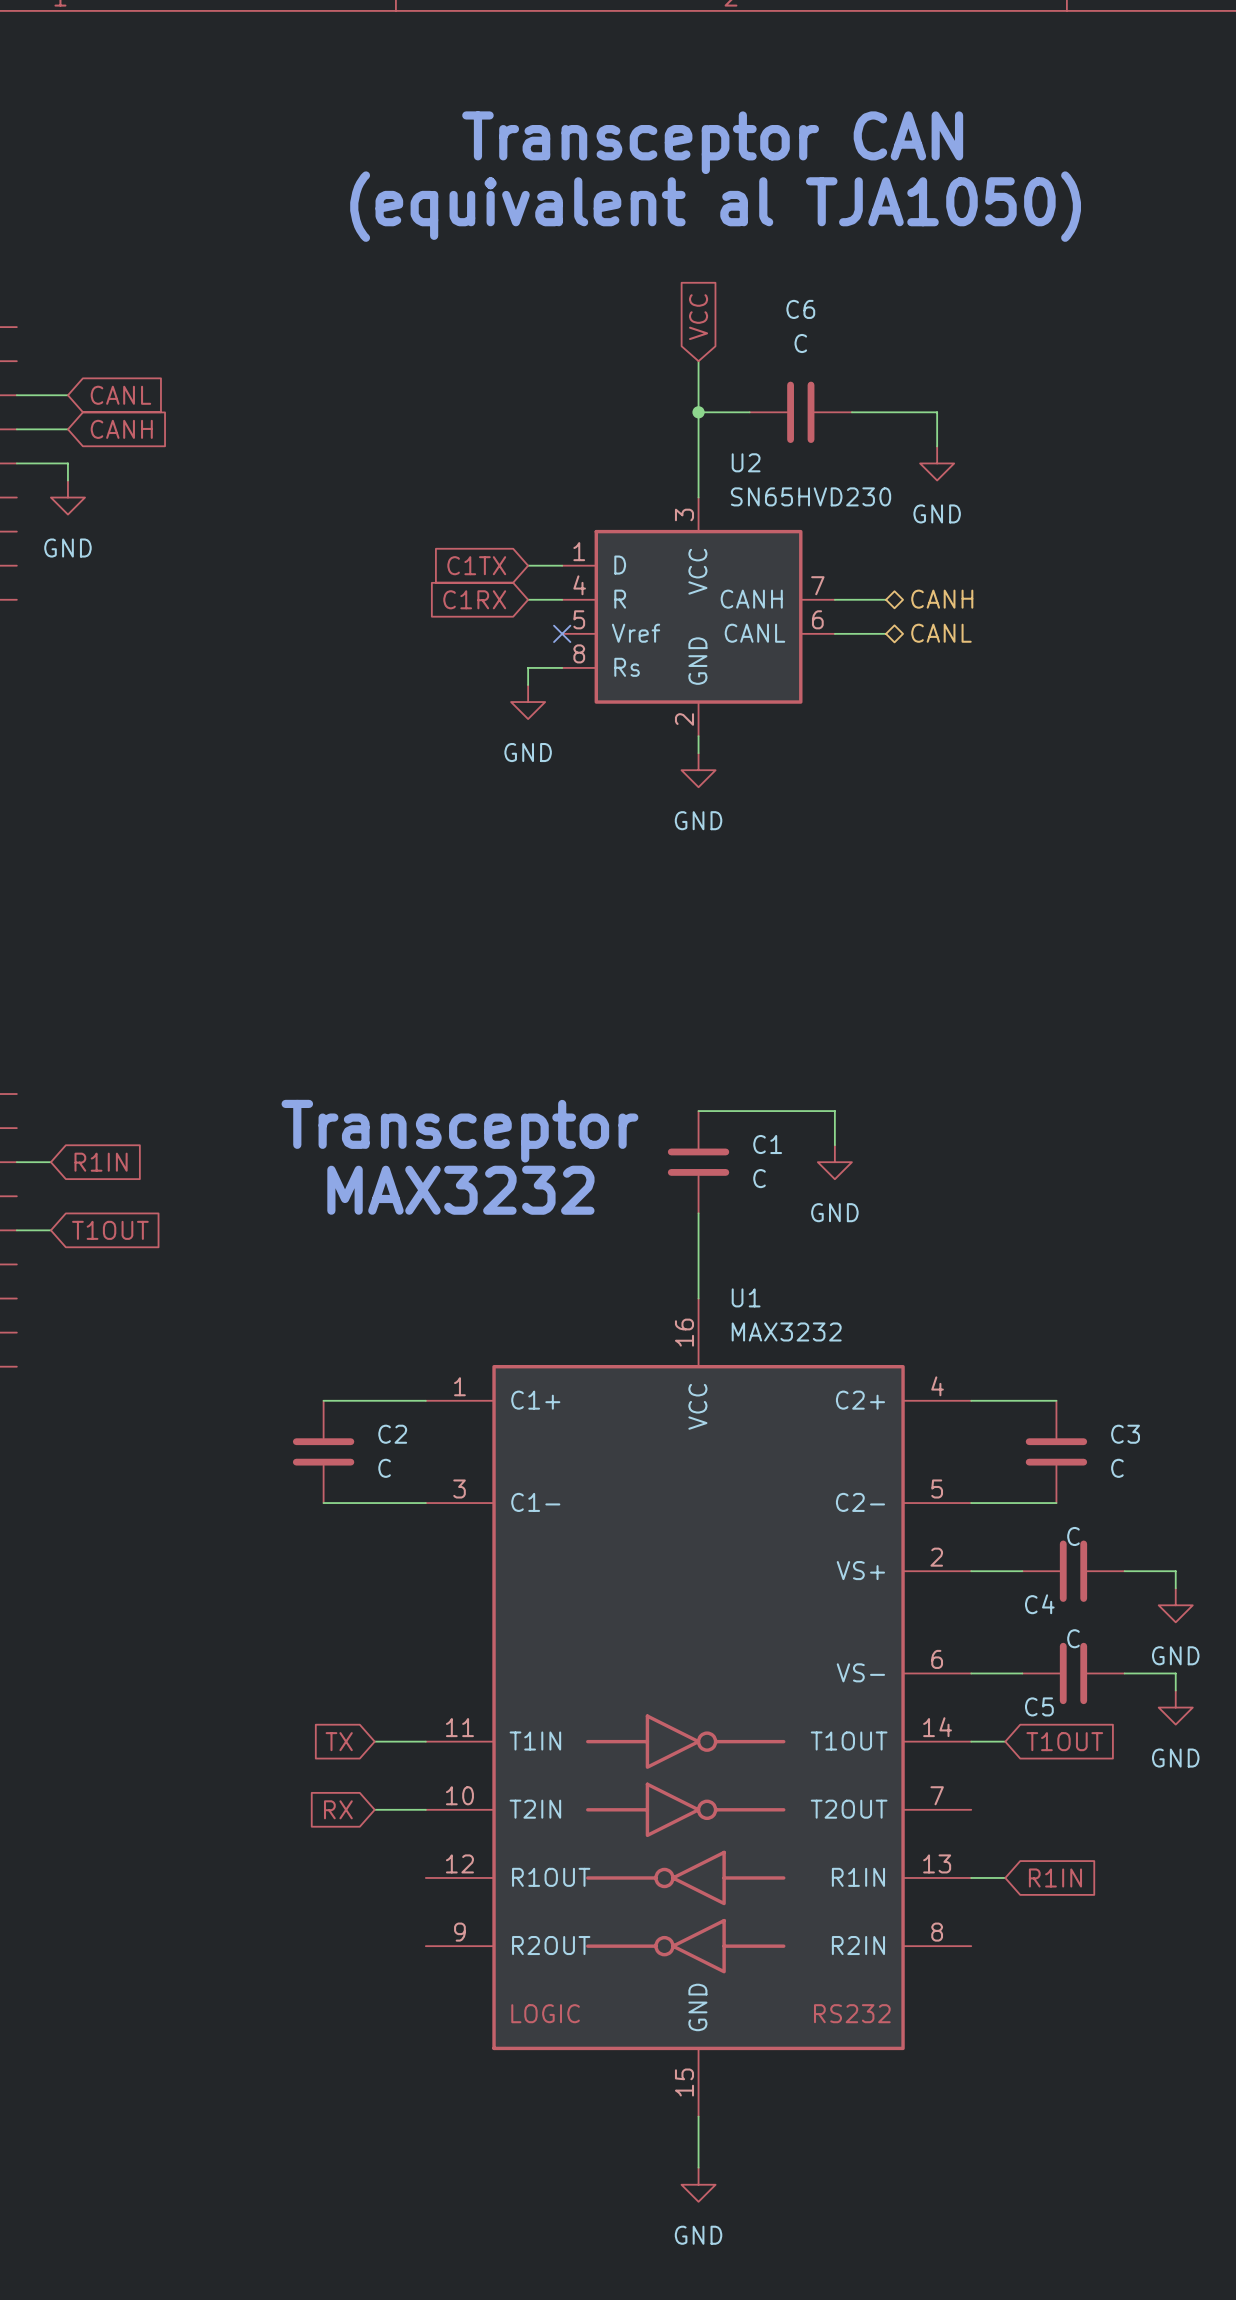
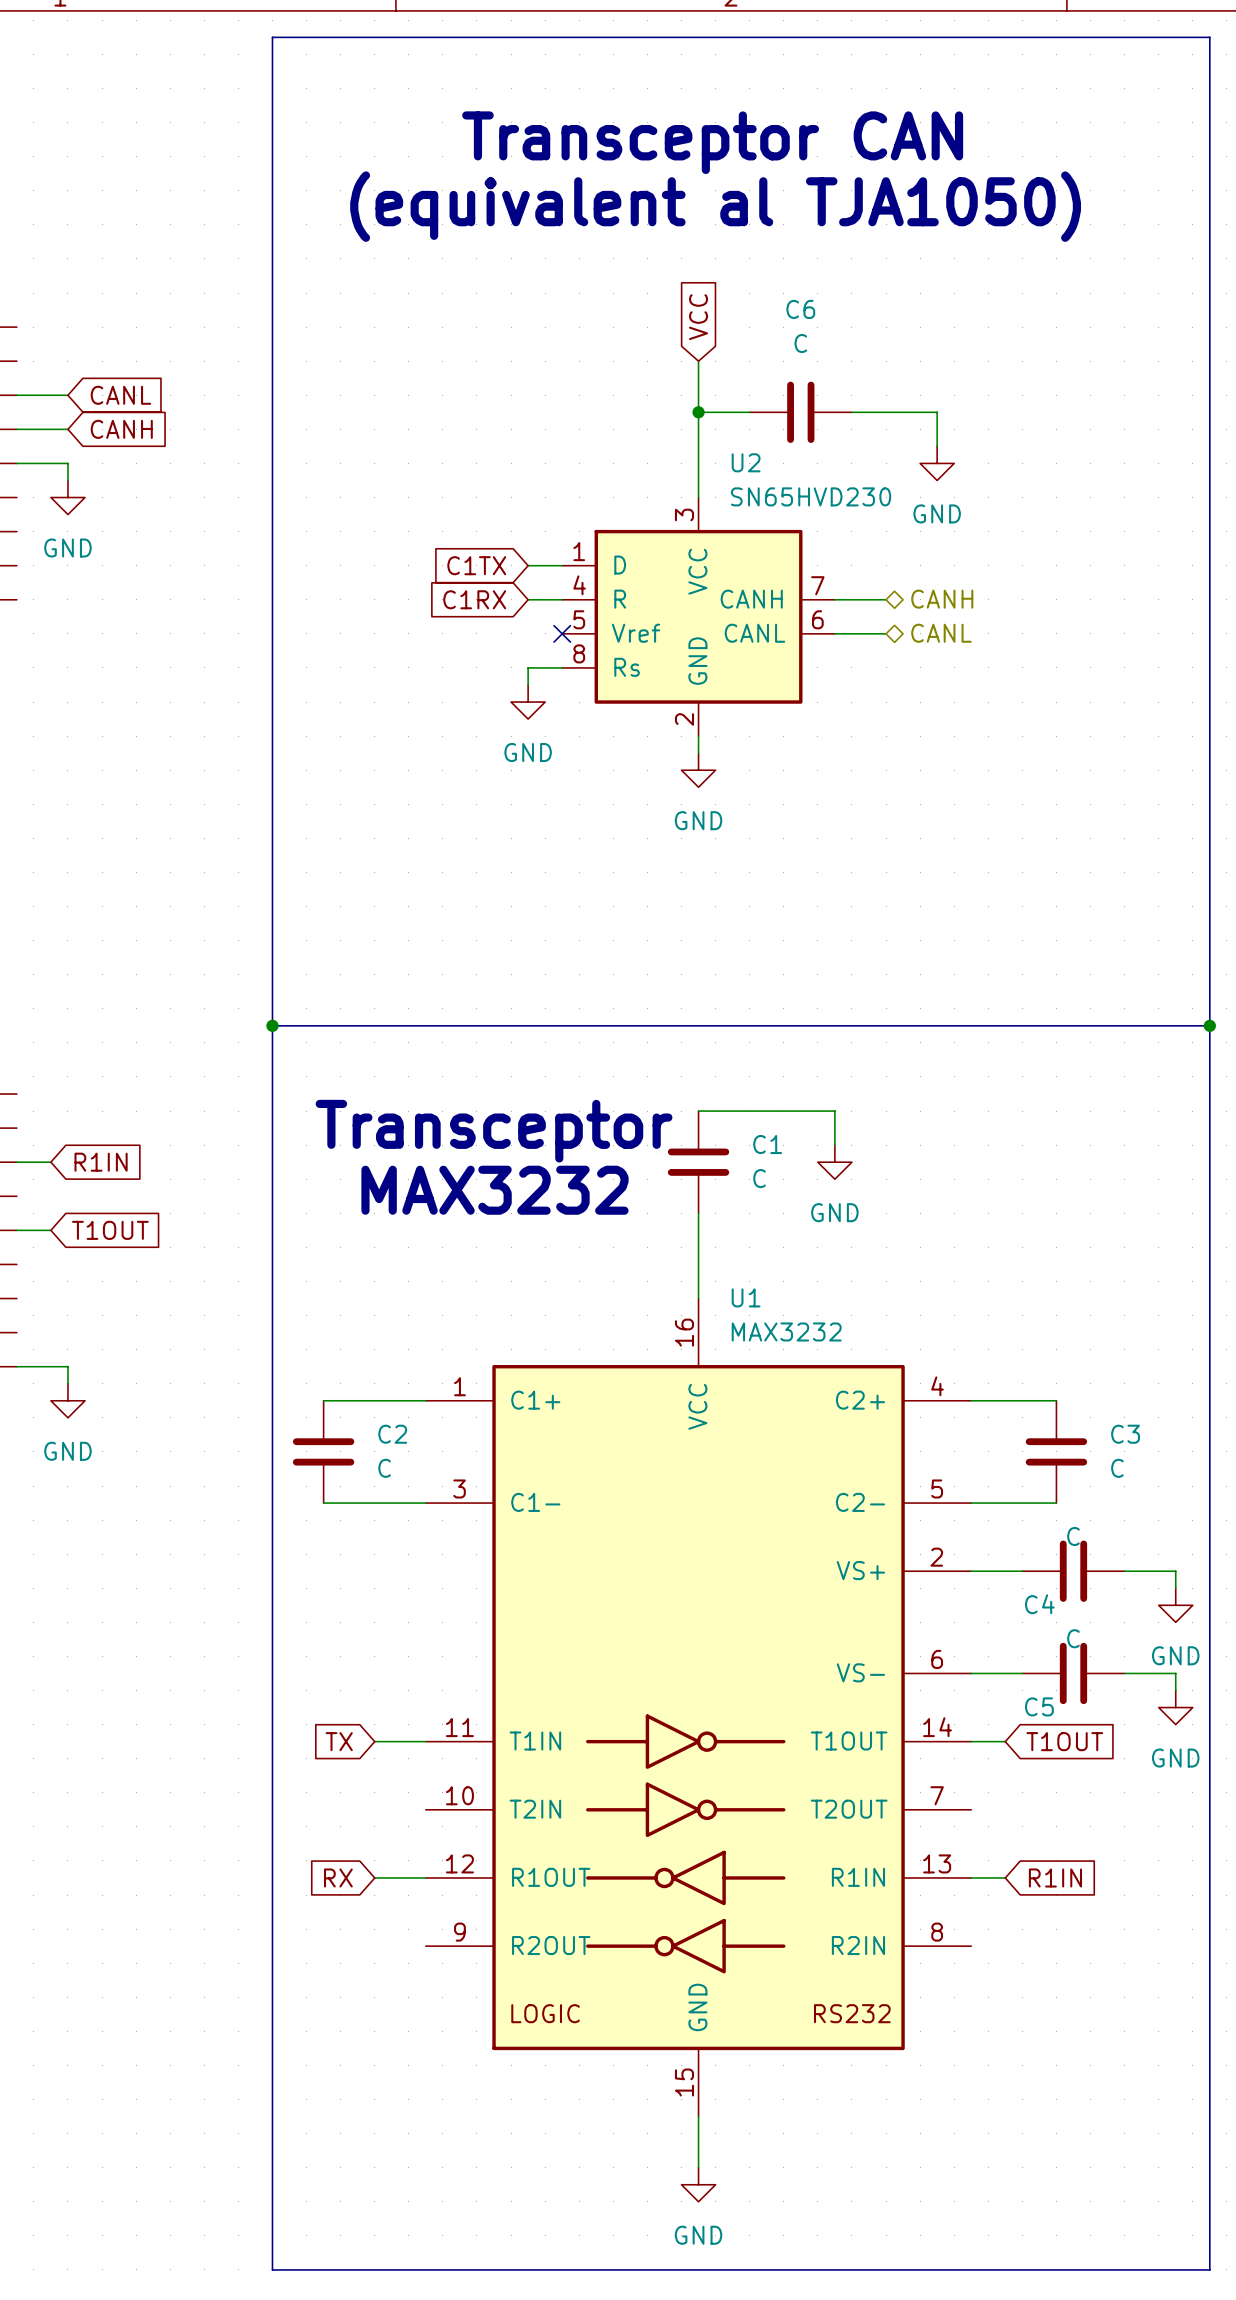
bus: none -> (272, 37) (272, 2269) (1209, 2269) (1209, 37) (272, 37)
bus: none -> (272, 1025) (1209, 1025)
junction: none -> (272, 1025)
junction: none -> (1209, 1025)
text position: Transceptor (459, 1131) -> Transceptor (494, 1131)
text position: MAX3232 (460, 1190) -> MAX3232 (495, 1190)
wire: none -> (16, 1366) (67, 1366) (67, 1383)
power symbol: none -> GND (67, 1400)
global label position: RX (338, 1809) -> RX (338, 1877)
wire: (374, 1809) (425, 1809) -> (374, 1877) (425, 1877)

